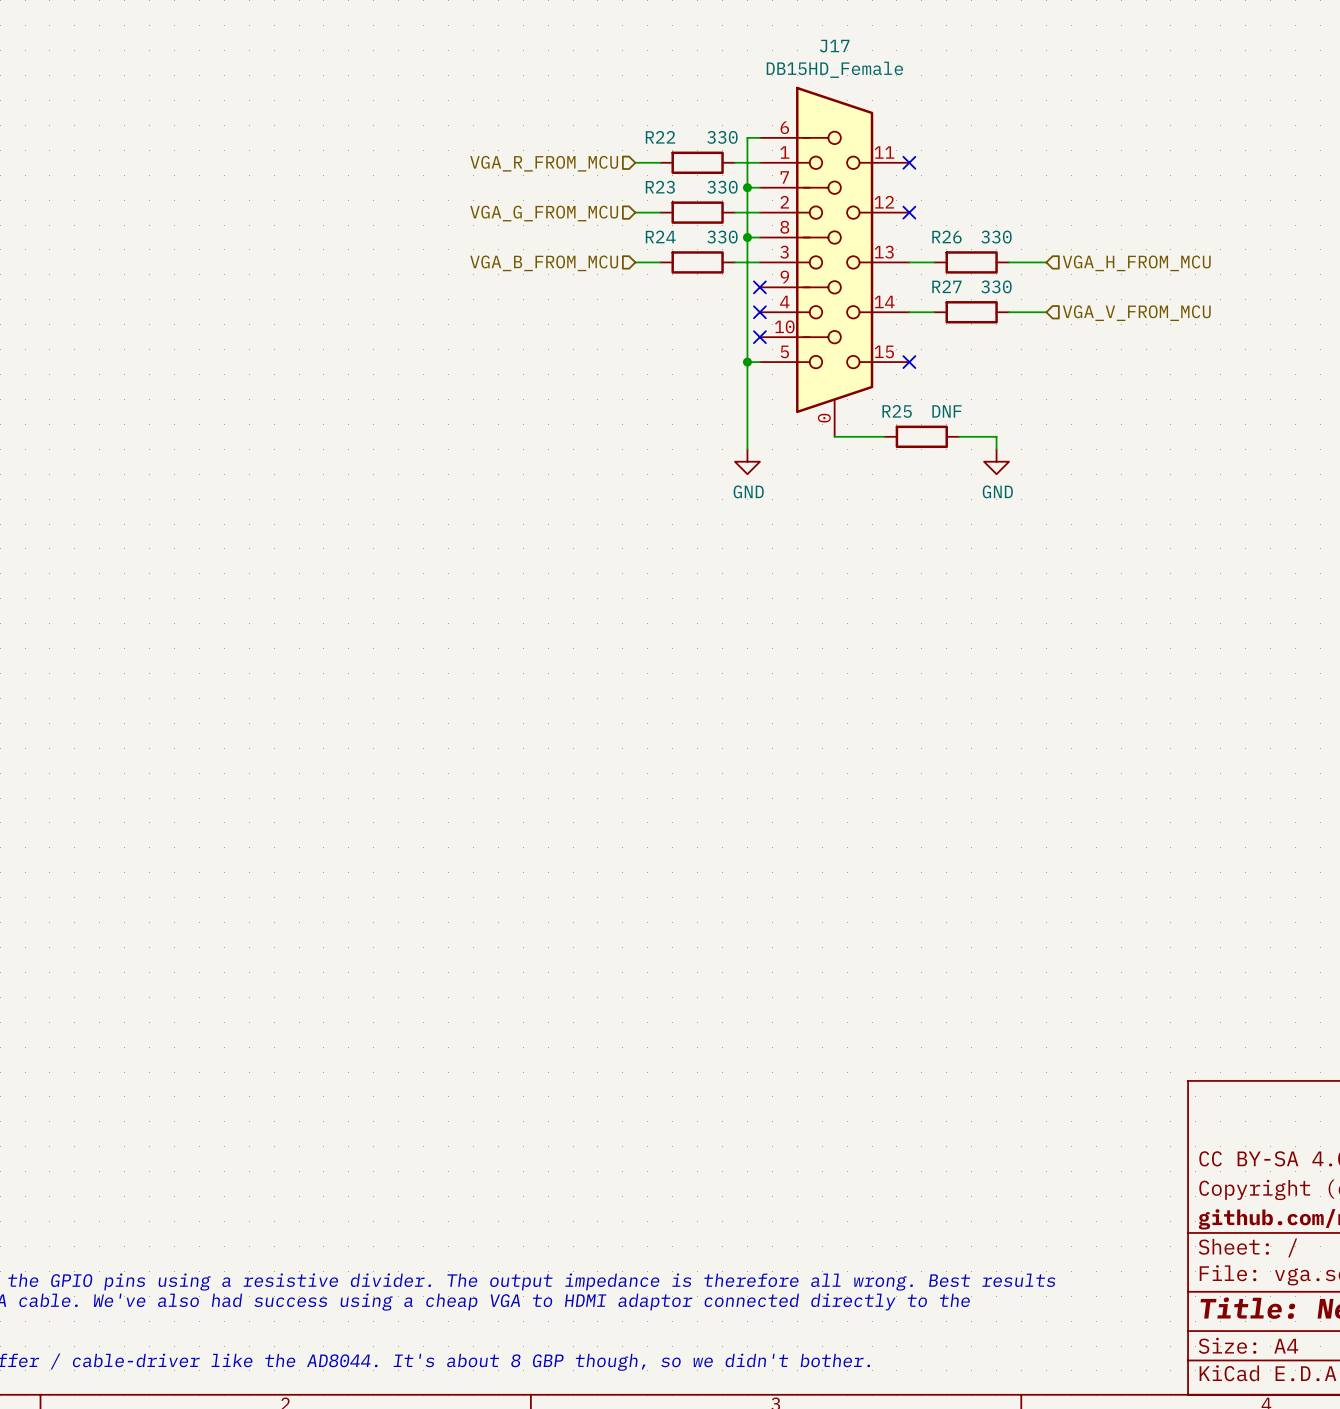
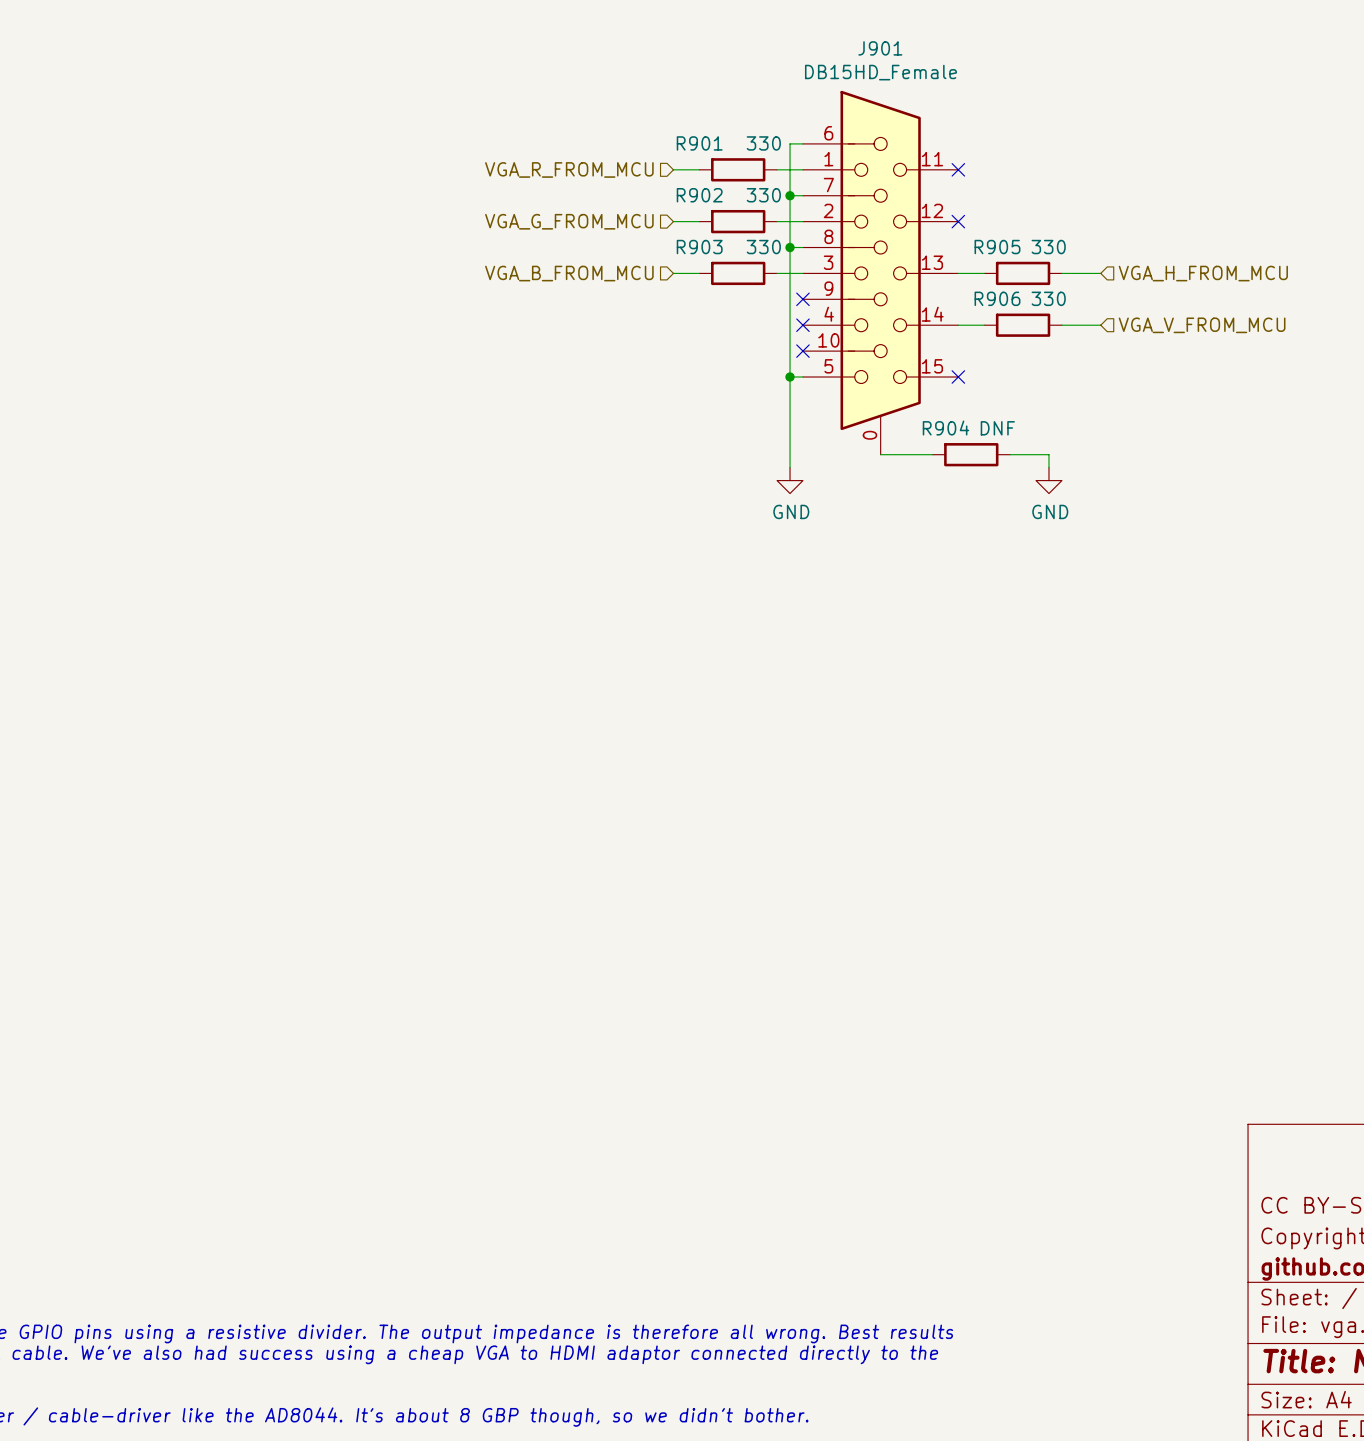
J17 name: J17 (834, 46) -> J901 (880, 48)
R22 name: R22 (660, 137) -> R901 (699, 143)
R23 name: R23 (660, 187) -> R902 (699, 195)
R24 name: R24 (660, 236) -> R903 (699, 247)
R26 name: R26 (946, 237) -> R905 (997, 247)
R27 name: R27 (946, 286) -> R906 (997, 298)
R25 name: R25 (897, 411) -> R904 (946, 428)

